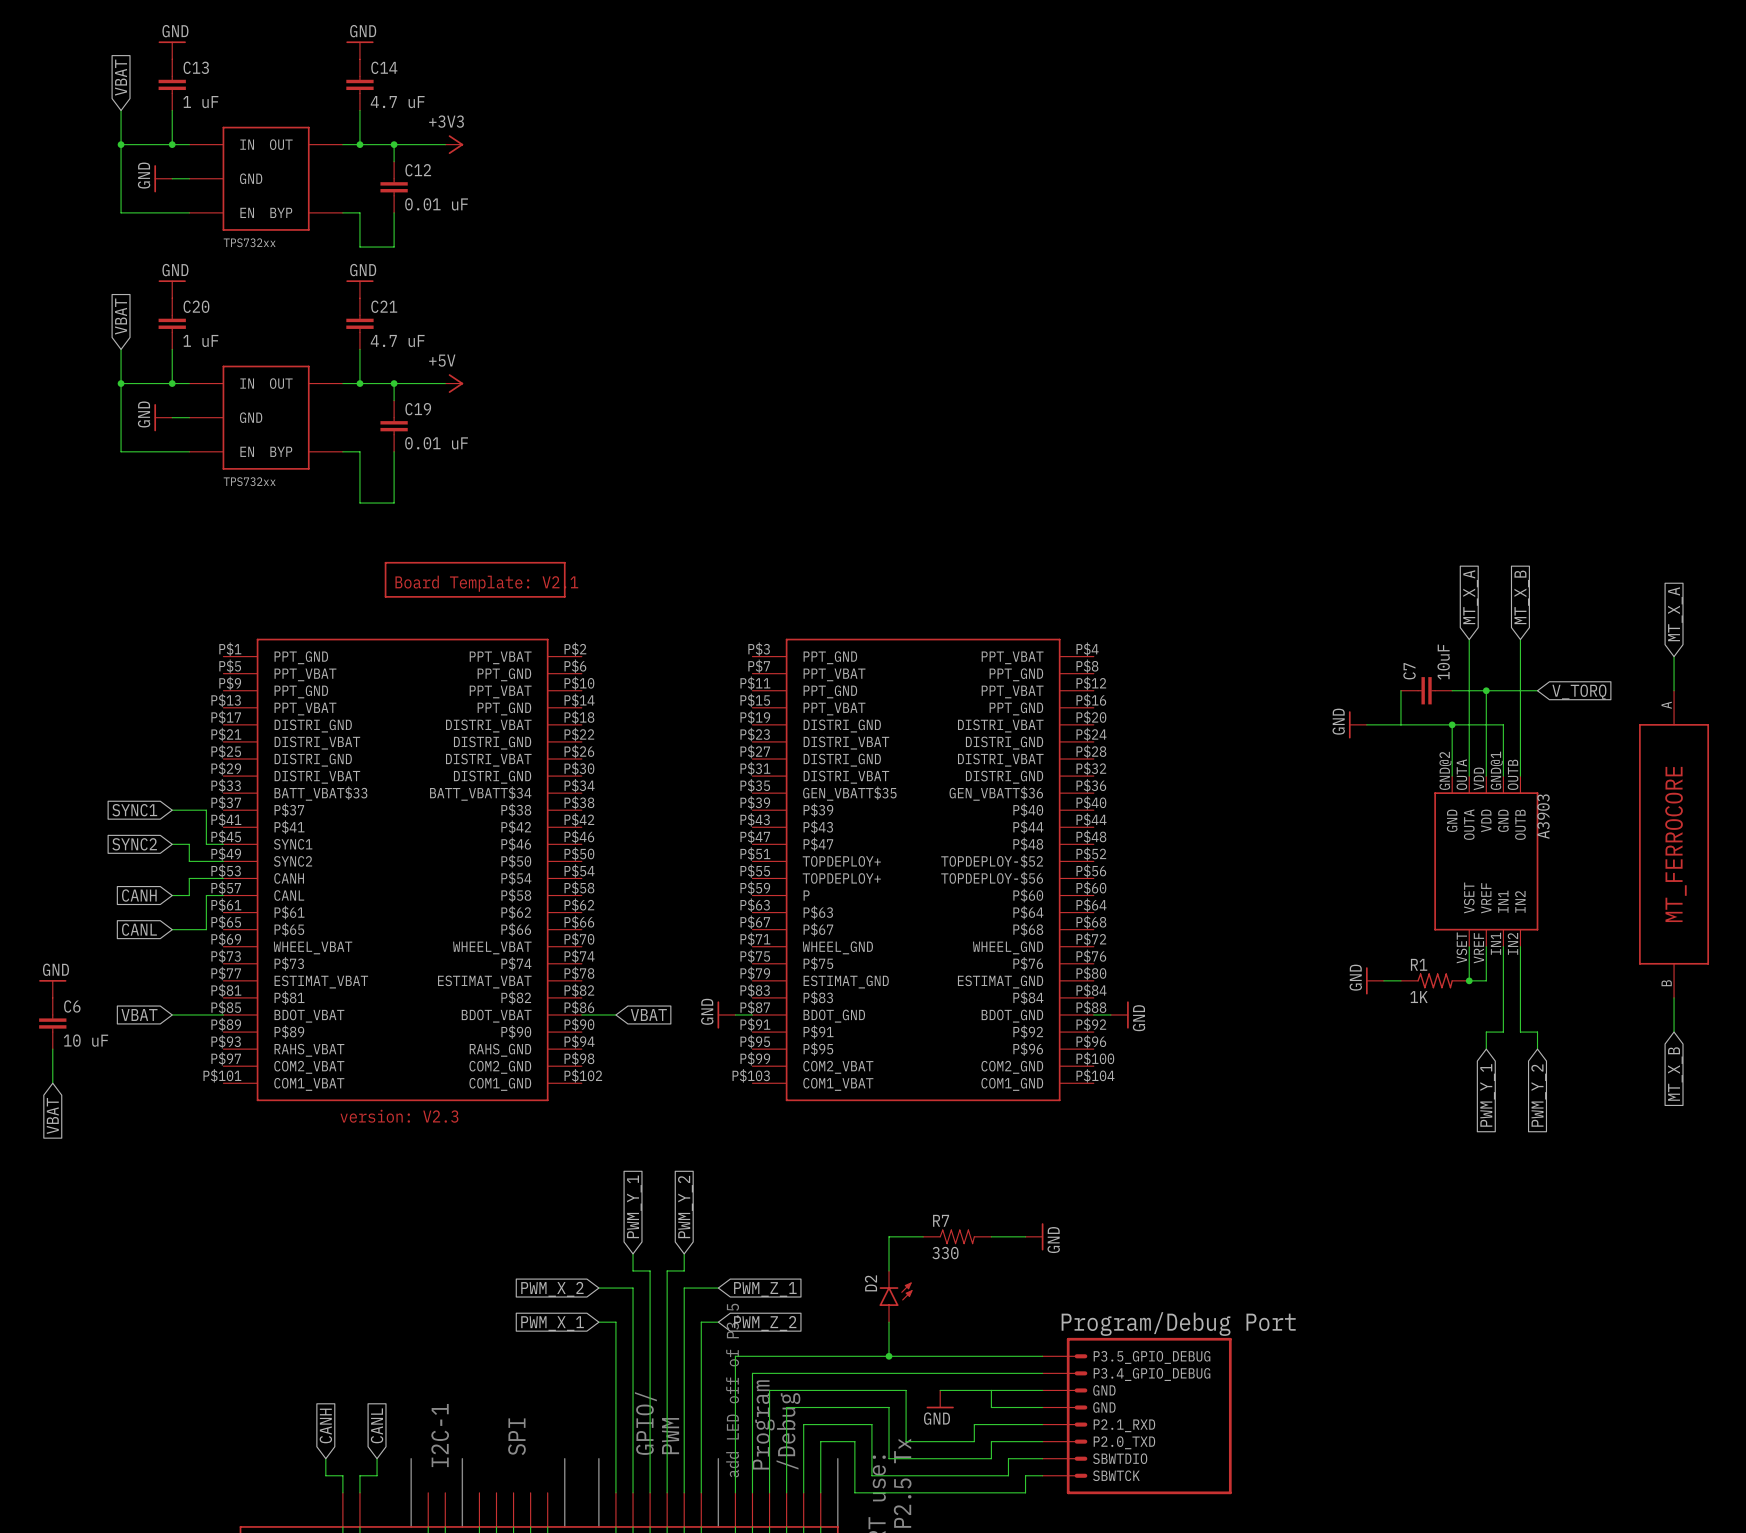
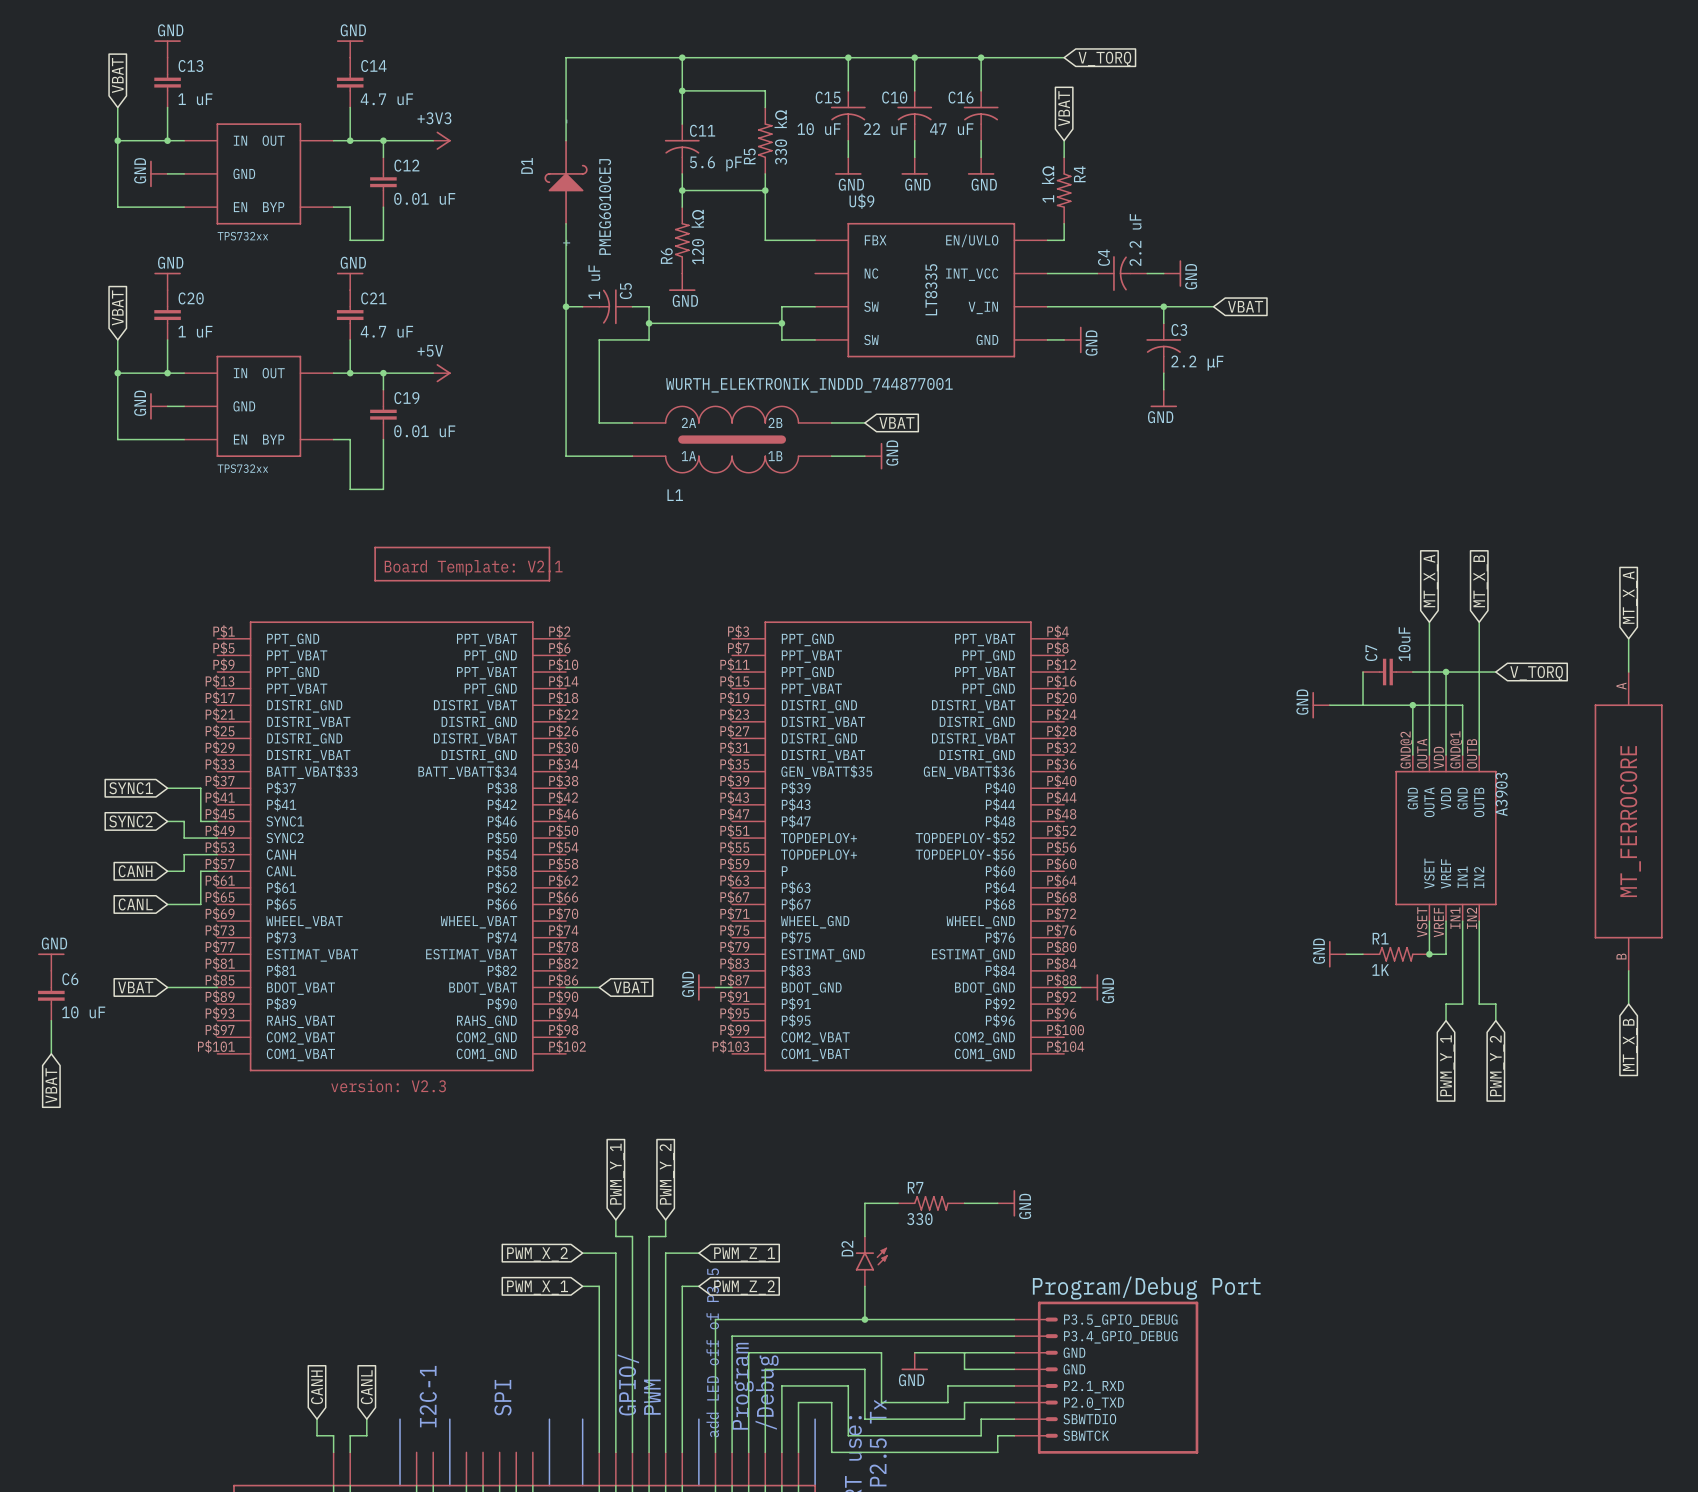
wire: none -> (682, 57) (682, 124)
junction: none -> (682, 57)
wire: none -> (848, 57) (848, 90)
junction: none -> (848, 57)
wire: none -> (914, 57) (914, 90)
junction: none -> (914, 57)
wire: none -> (981, 57) (981, 90)
junction: none -> (981, 57)
wire: none -> (1064, 57) (566, 57) (566, 140)
global label: none -> V_TORQ (1104, 59)
wire: none -> (682, 90) (765, 90) (765, 107)
junction: none -> (682, 90)
global label: none -> VBAT (1064, 108)
C15: none -> 10 uF (848, 115)
C10: none -> 22 uF (914, 115)
C16: none -> 47 uF (981, 115)
R5: none -> 330 kΩ (765, 140)
wire: none -> (848, 140) (848, 157)
wire: none -> (914, 140) (914, 157)
wire: none -> (981, 140) (981, 157)
wire: none -> (1064, 140) (1064, 157)
C11: none -> 5.6 pF (682, 149)
power symbol: none -> GND (848, 166)
power symbol: none -> GND (914, 166)
power symbol: none -> GND (981, 166)
wire: none -> (682, 173) (682, 207)
wire: none -> (765, 173) (765, 240) (815, 240)
D1: none -> PMEG6010CEJ (566, 182)
wire: none -> (682, 190) (765, 190)
junction: none -> (682, 190)
junction: none -> (765, 190)
R4: none -> 1 kΩ (1064, 190)
wire: none -> (566, 223) (566, 456) (632, 456)
wire: none -> (1064, 223) (1064, 240) (1047, 240)
R6: none -> 120 kΩ (682, 240)
wire: none -> (1047, 273) (1097, 273)
C4: none -> 2.2 uF (1122, 273)
wire: none -> (1147, 273) (1163, 273)
power symbol: none -> GND (1172, 273)
power symbol: none -> GND (682, 282)
U$9: none -> LT8335 (931, 290)
wire: none -> (566, 306) (582, 306)
junction: none -> (566, 306)
C5: none -> 1 uF (607, 306)
wire: none -> (632, 306) (649, 306) (649, 339) (599, 339) (599, 422) (632, 422)
wire: none -> (815, 306) (781, 306) (781, 339) (815, 339)
wire: none -> (1047, 306) (1213, 306)
wire: none -> (1163, 306) (1163, 323)
junction: none -> (1163, 306)
global label: none -> VBAT (1245, 306)
wire: none -> (649, 323) (781, 323)
junction: none -> (649, 323)
junction: none -> (781, 323)
wire: none -> (1047, 339) (1064, 339)
power symbol: none -> GND (1072, 339)
C3: none -> 2.2 μF (1163, 348)
wire: none -> (1163, 373) (1163, 389)
power symbol: none -> GND (1163, 398)
wire: none -> (831, 422) (864, 422)
global label: none -> VBAT (896, 422)
L1: none -> WURTH_ELEKTRONIK_INDDD_744877001 (732, 439)
wire: none -> (831, 456) (864, 456)
power symbol: none -> GND (873, 456)

